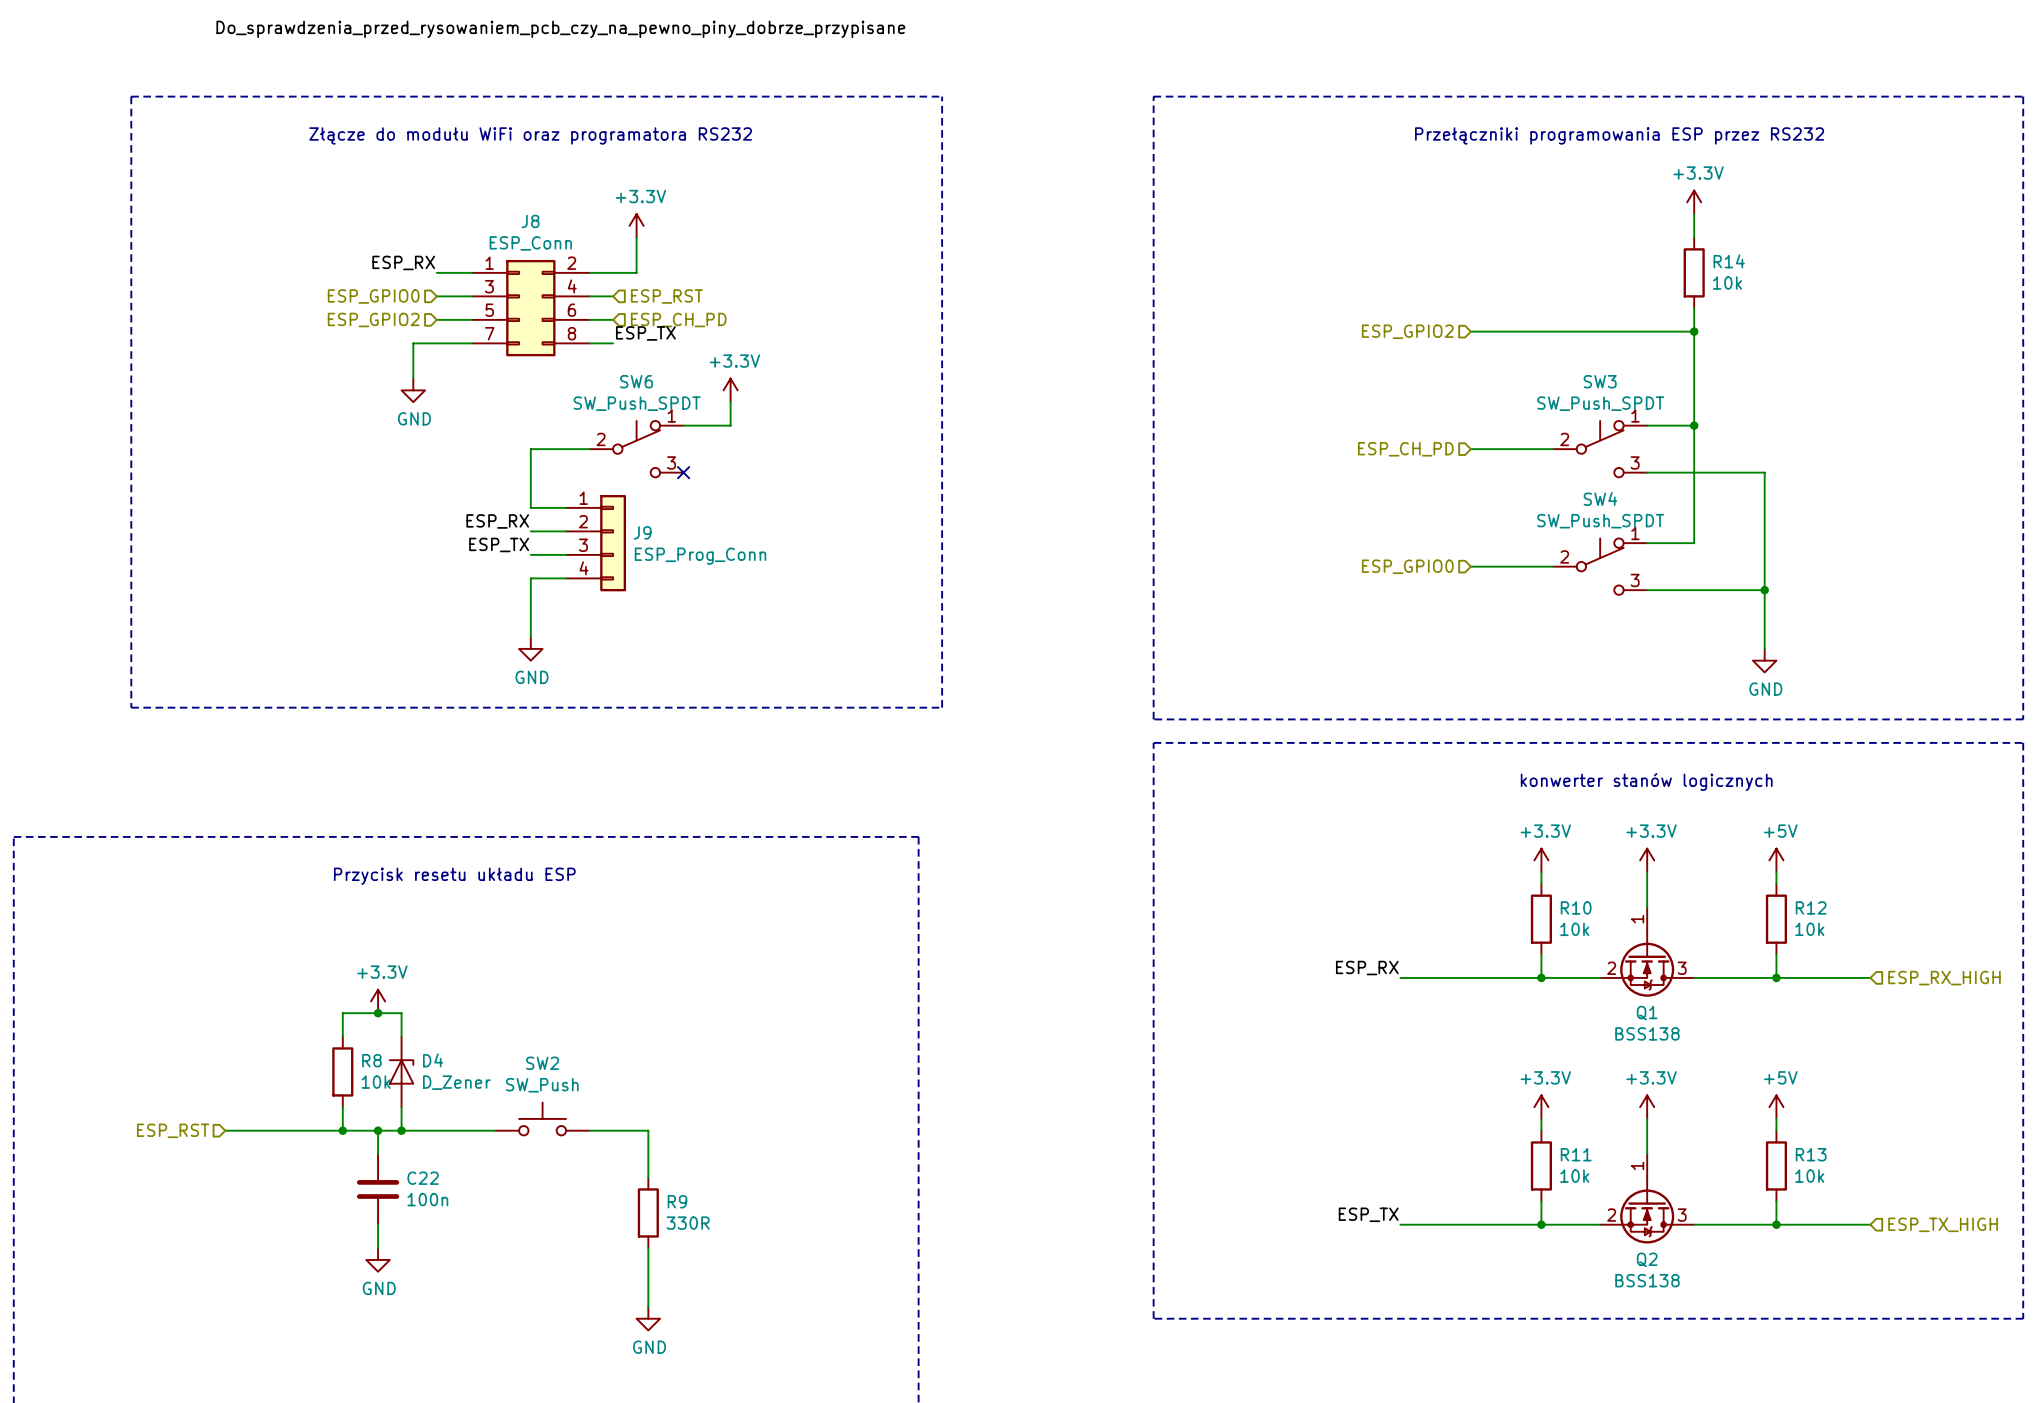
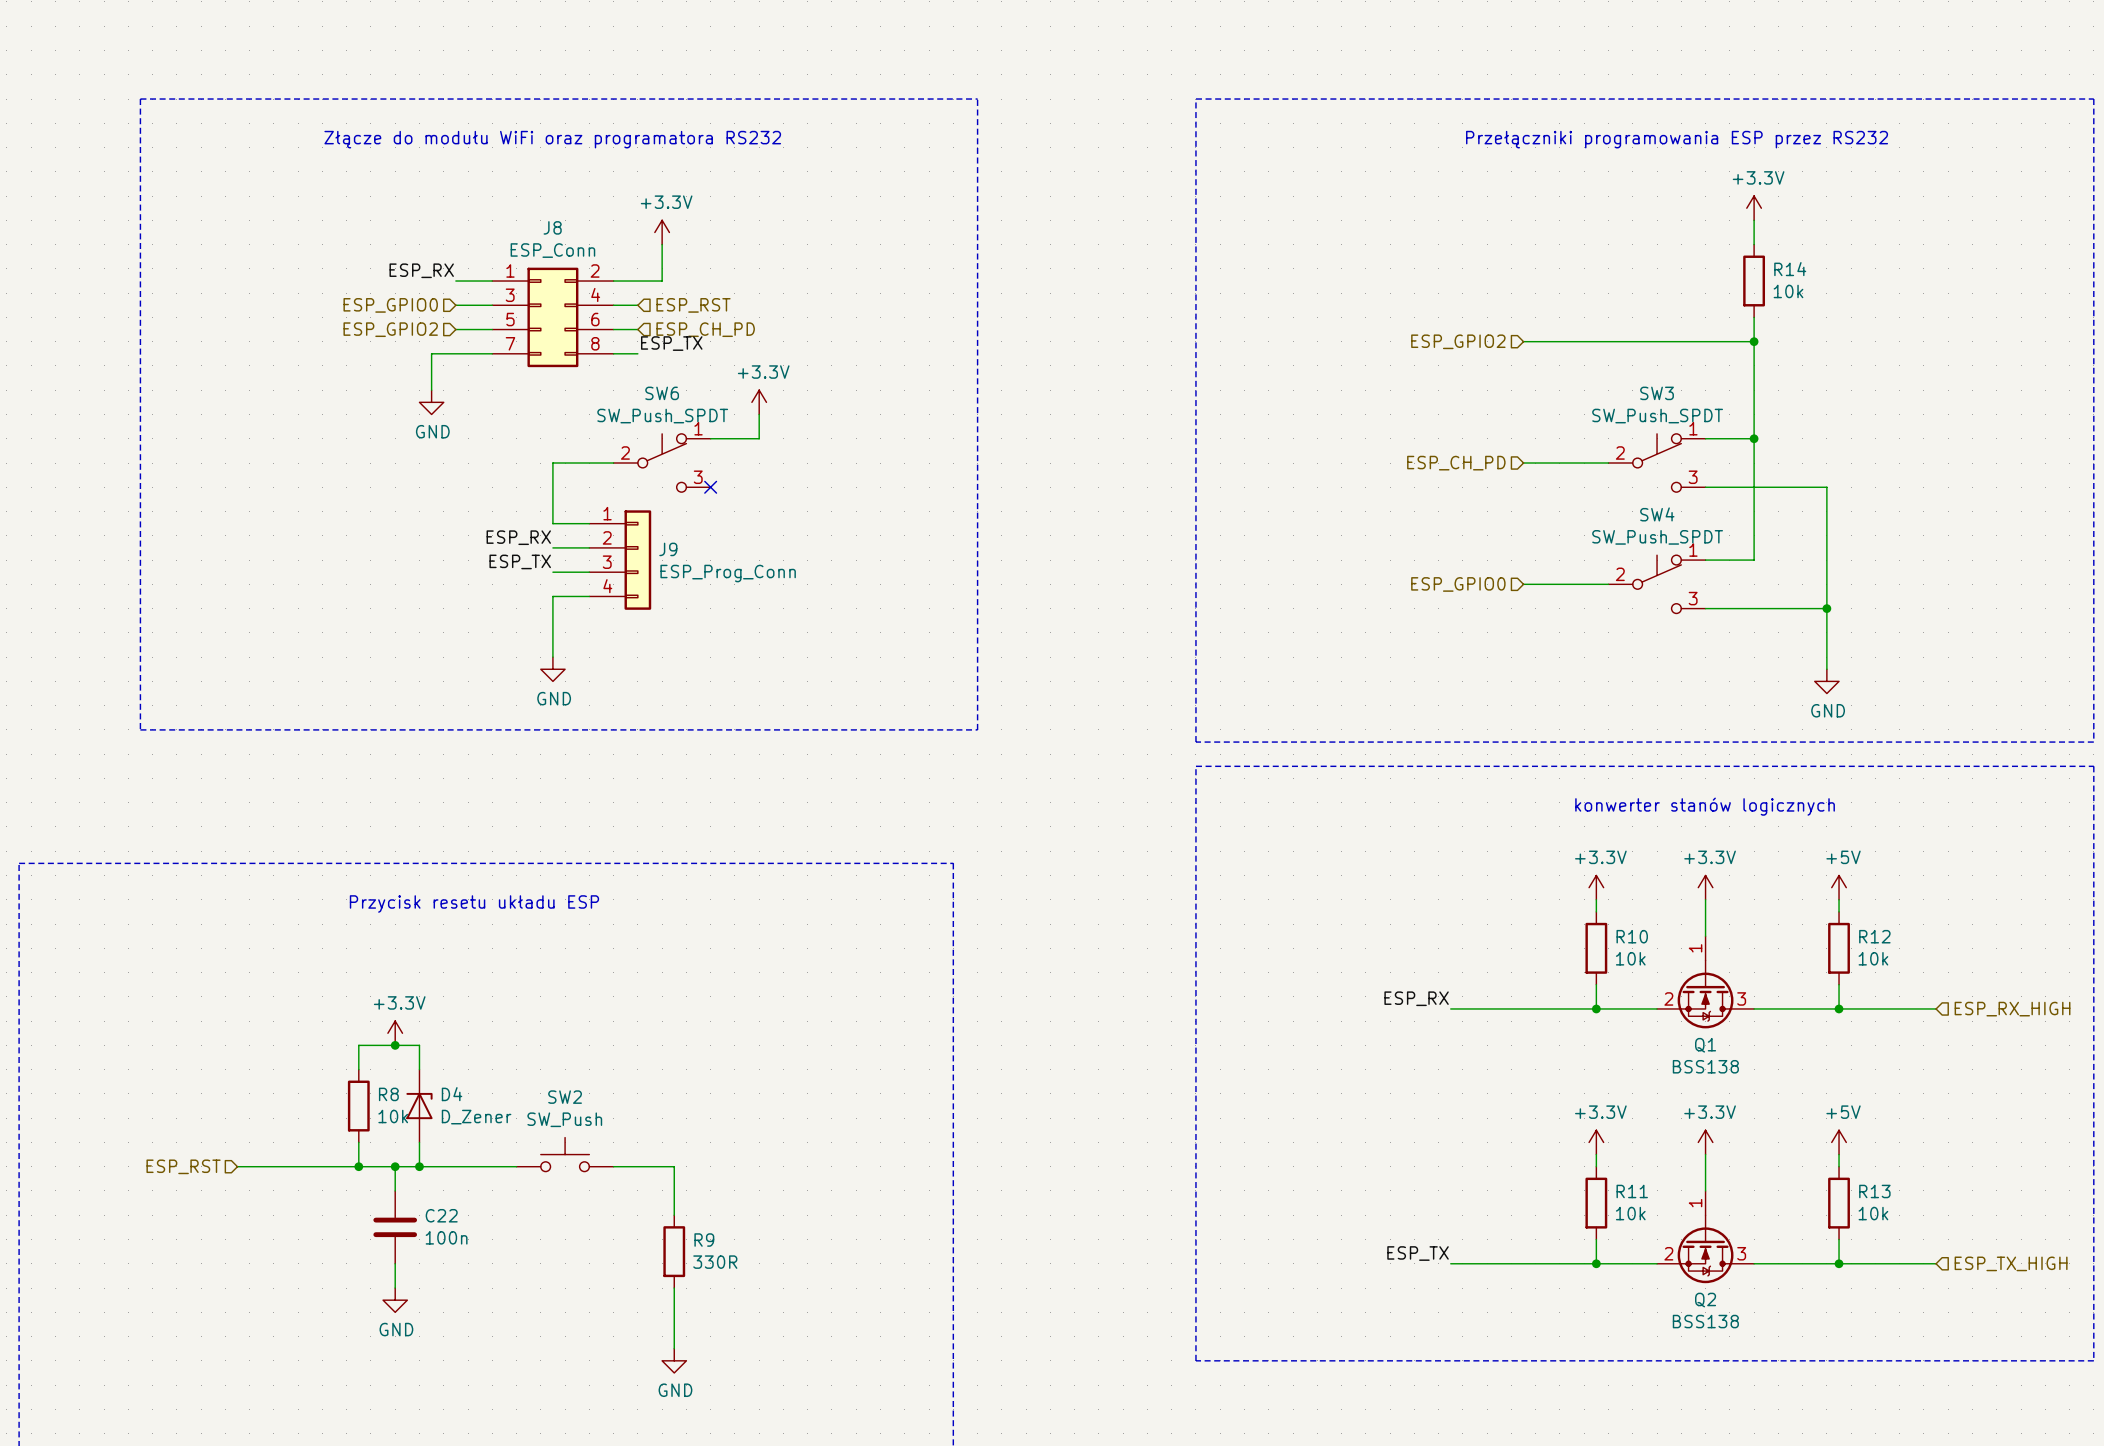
label: Do_sprawdzenia_przed_rysowaniem_pcb_czy_na_pewno_piny_dobrze_przypisane (560, 29) -> none

